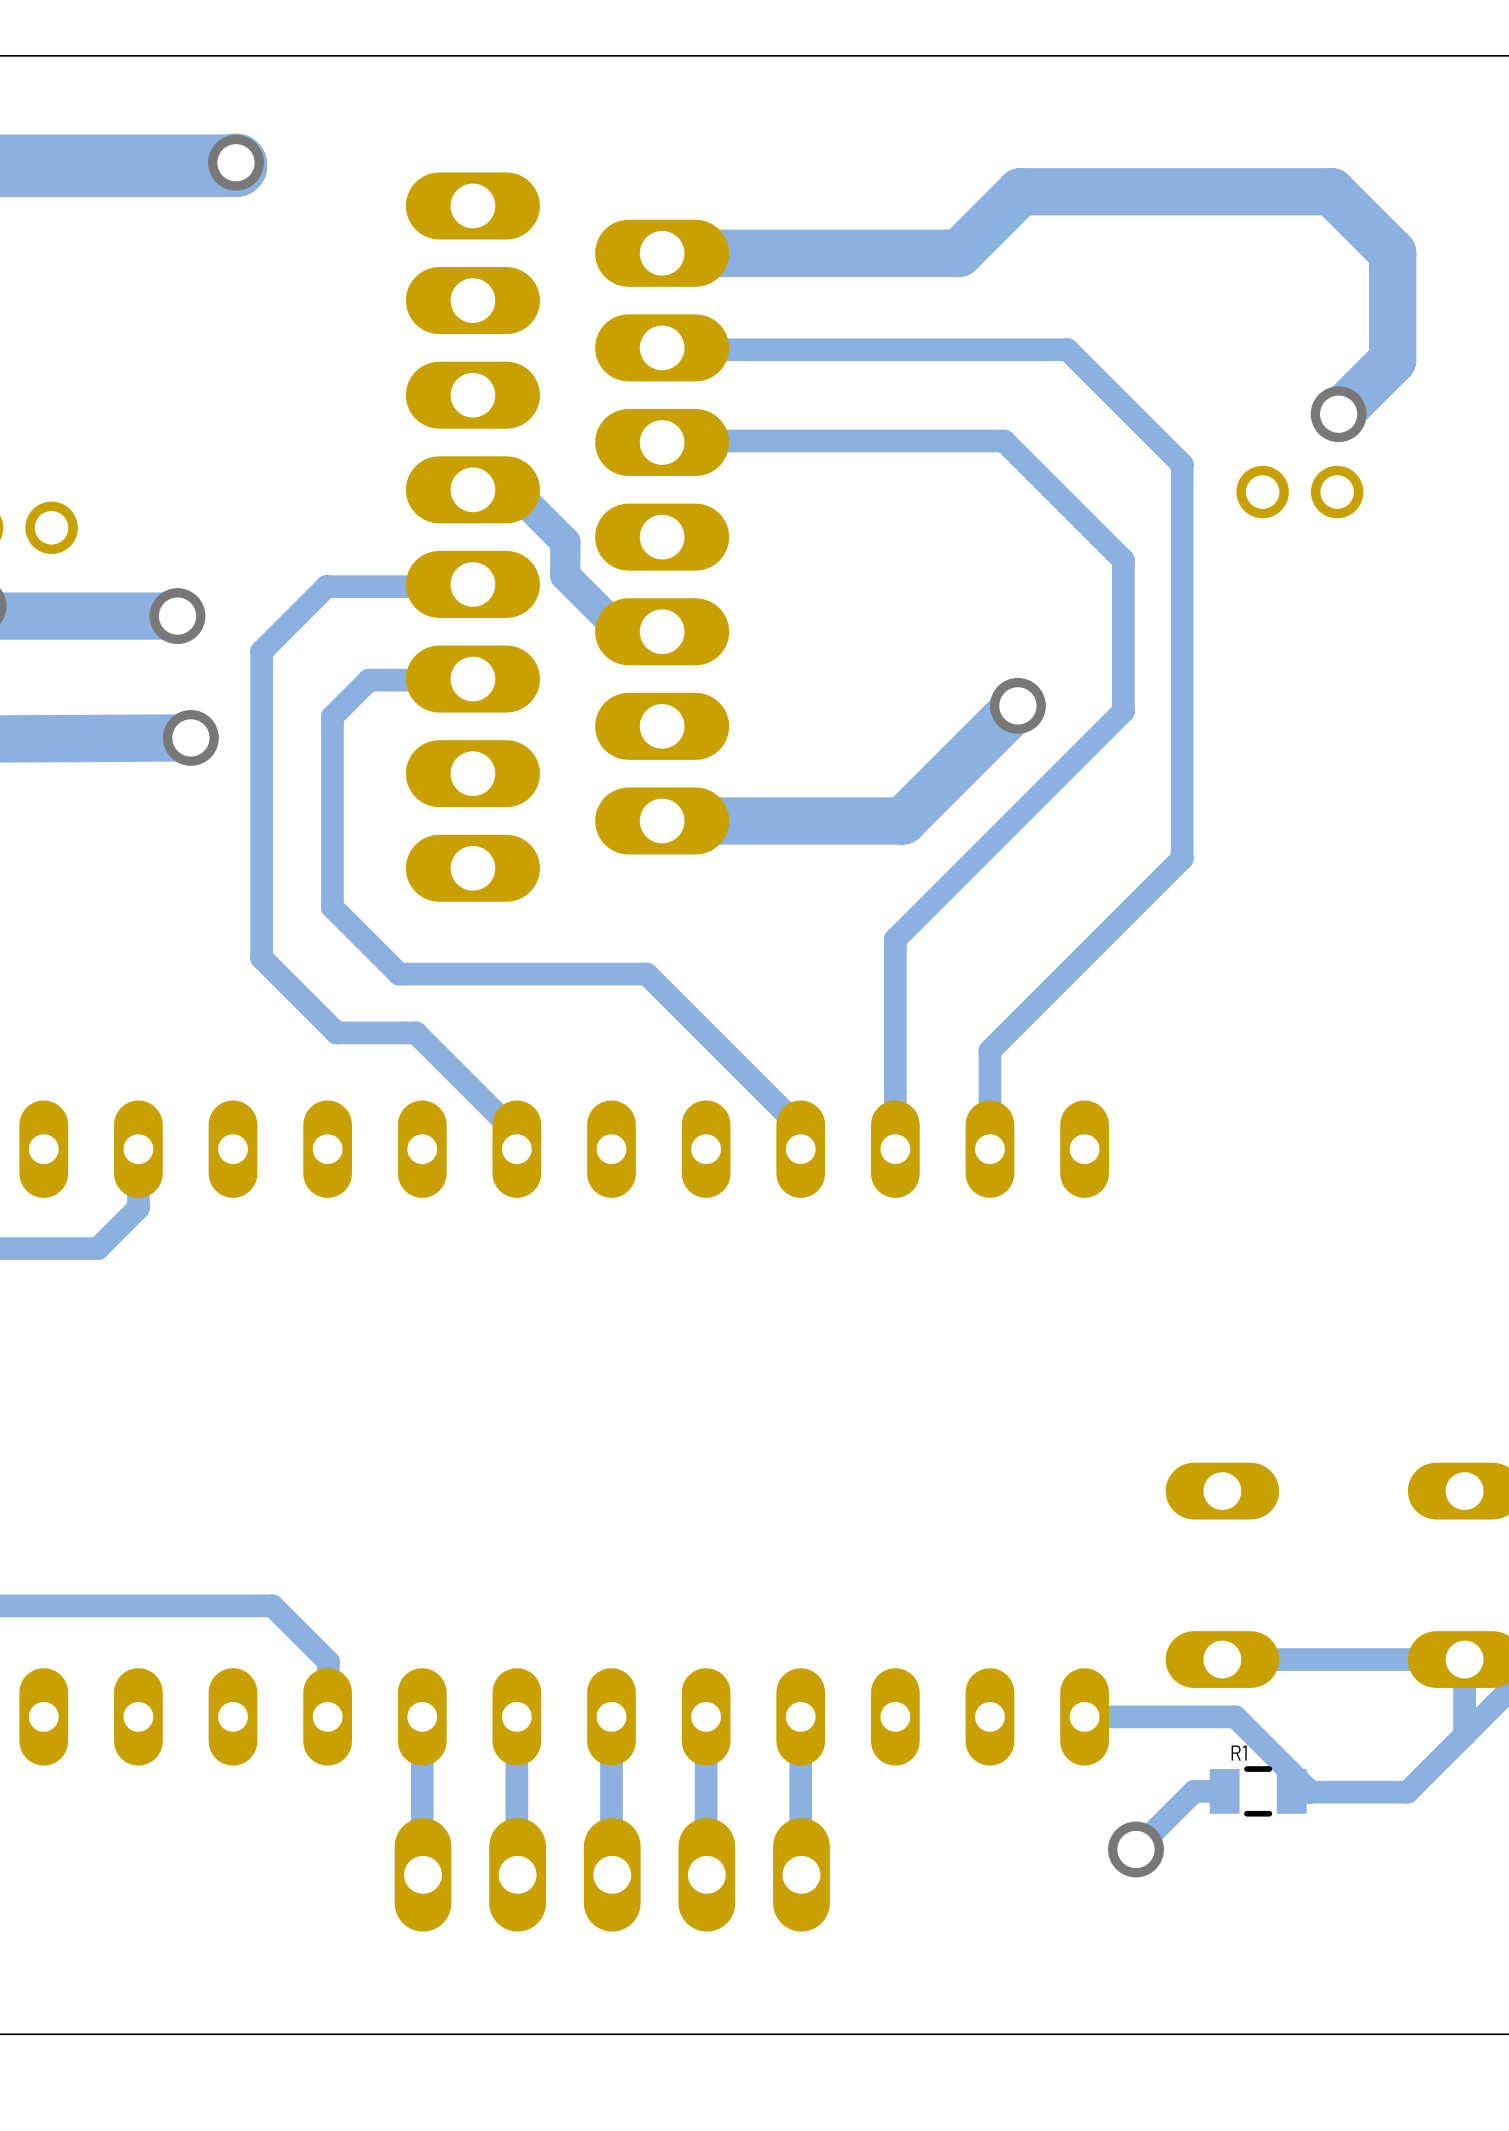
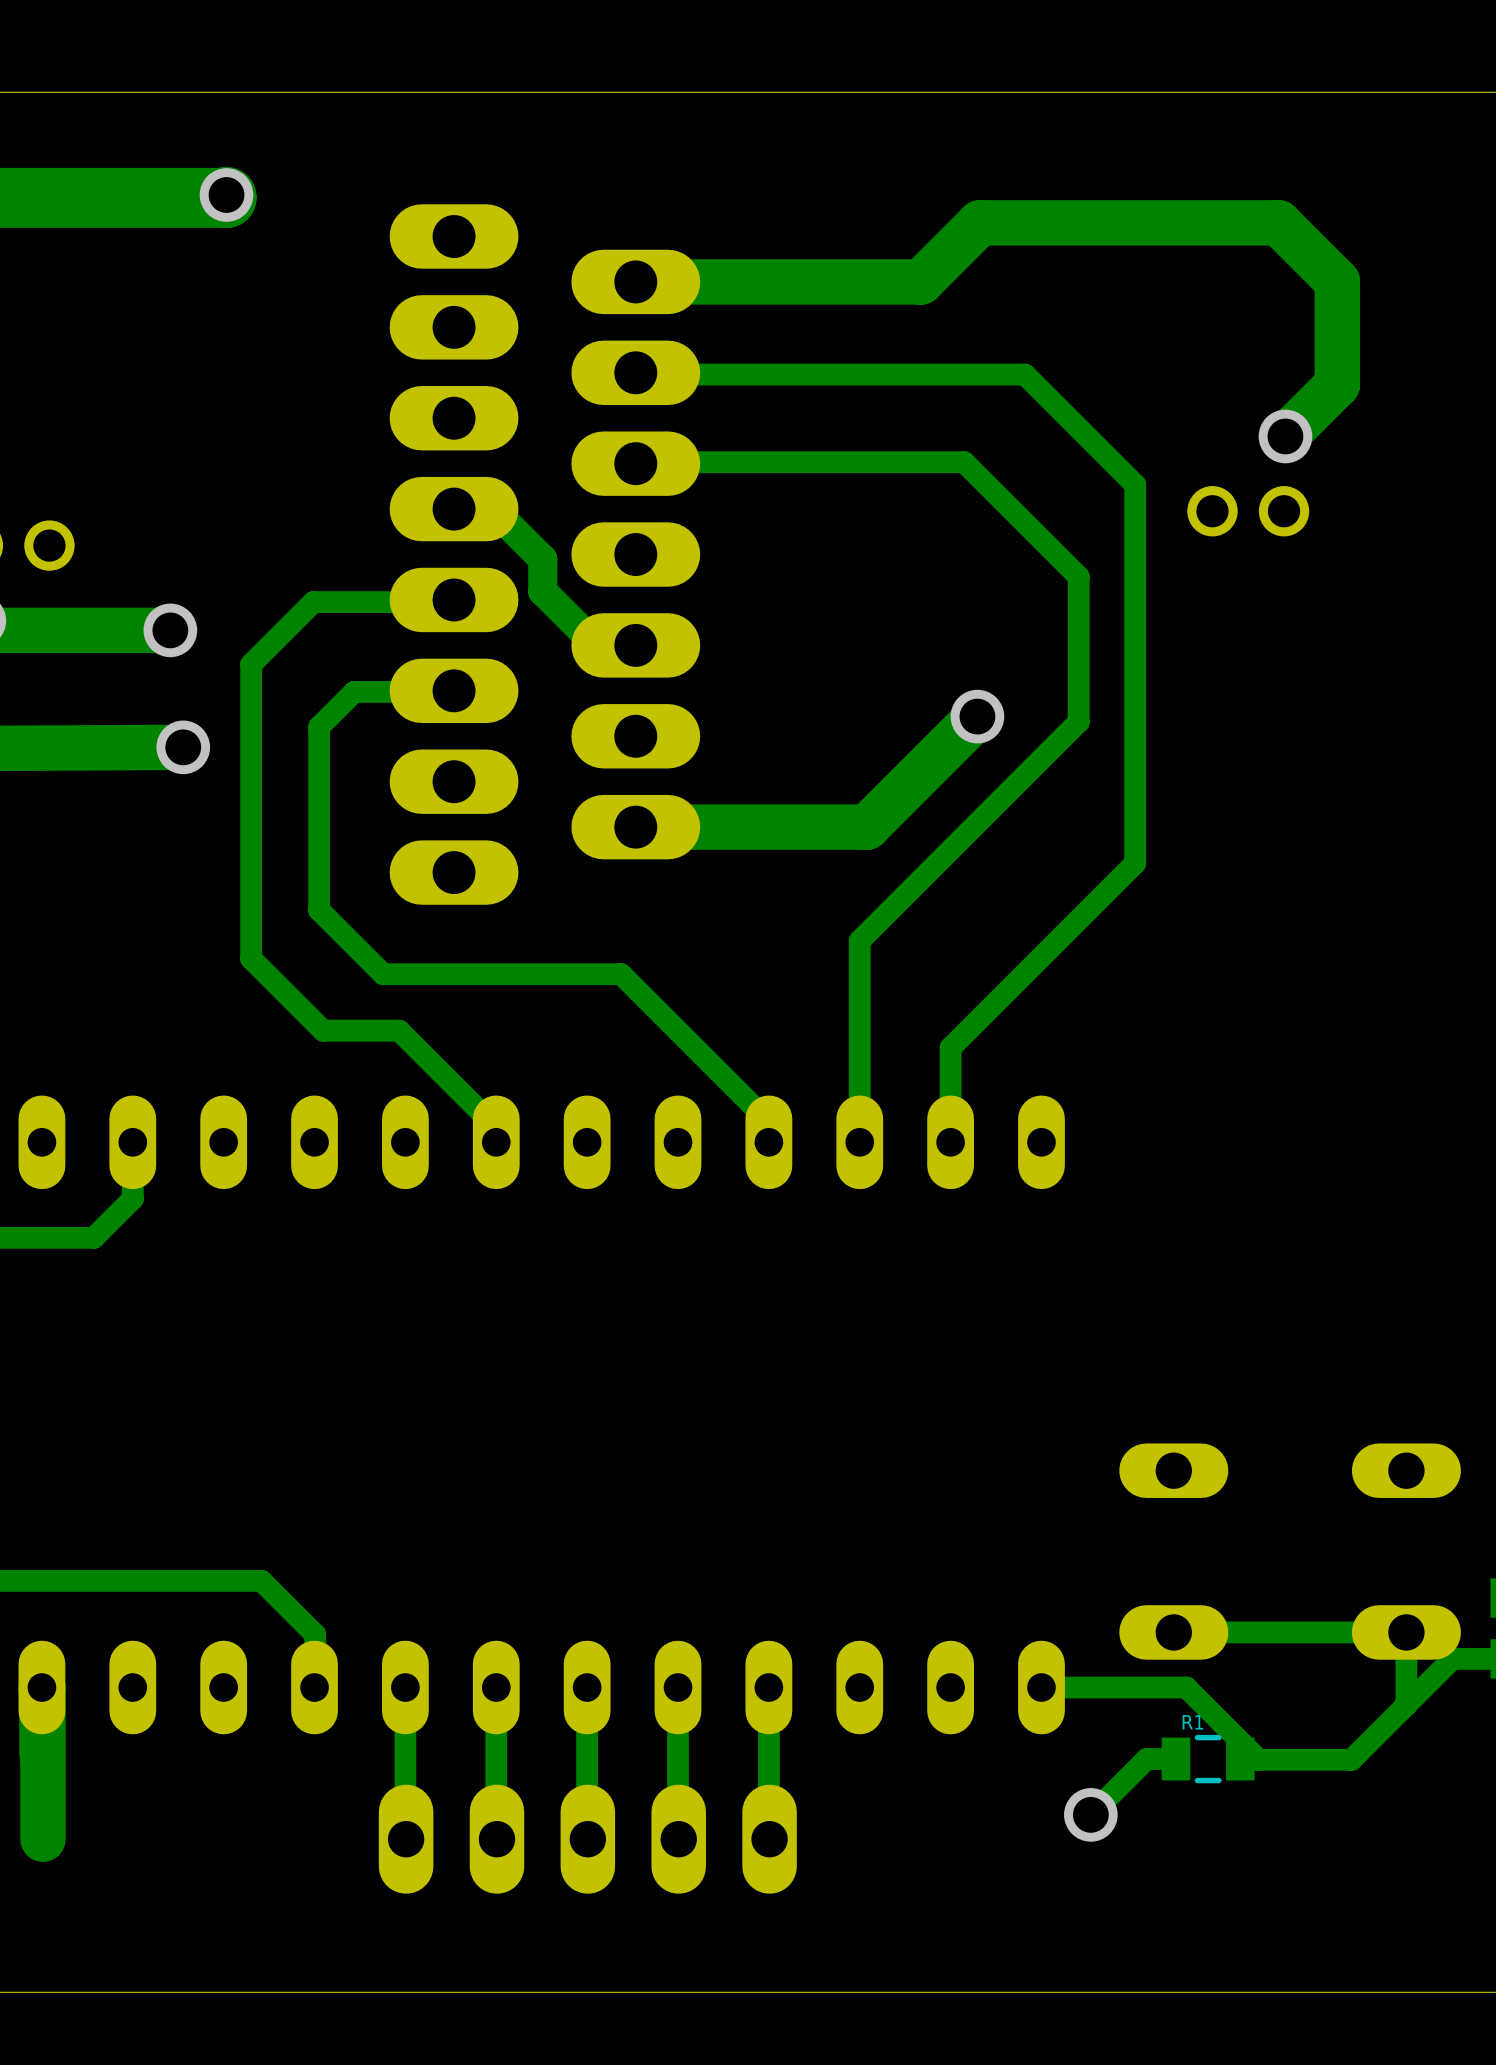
track: none -> (41, 1687) (43, 1839)

